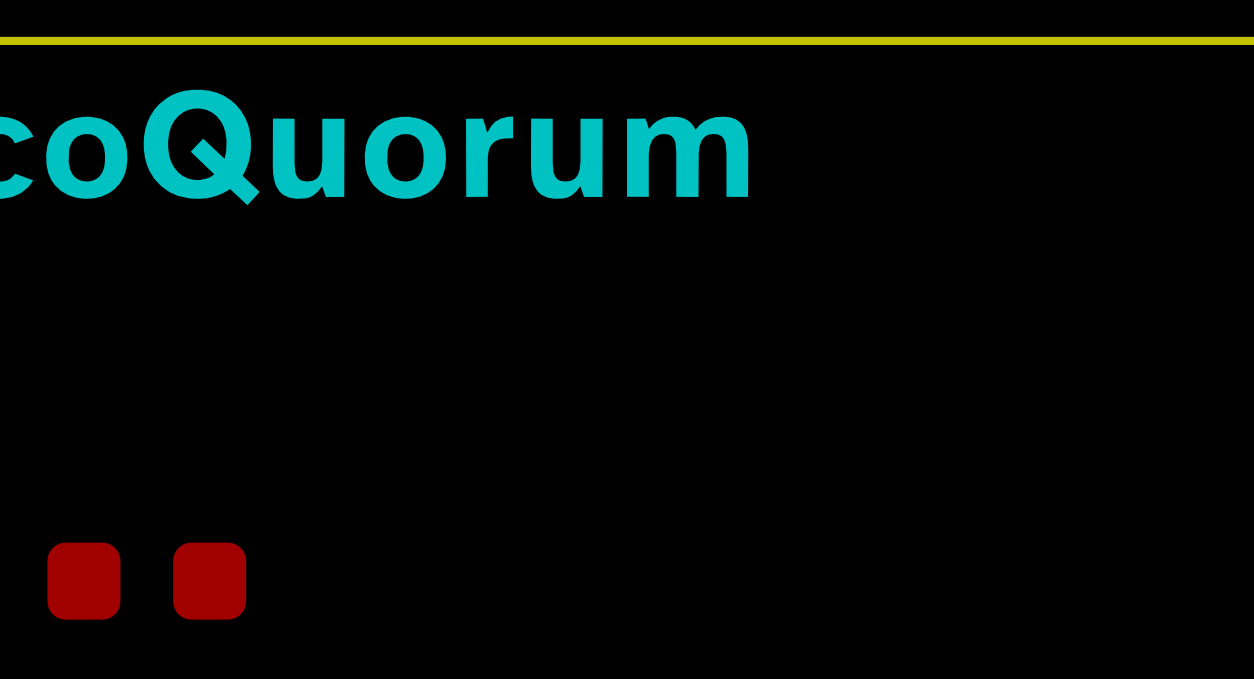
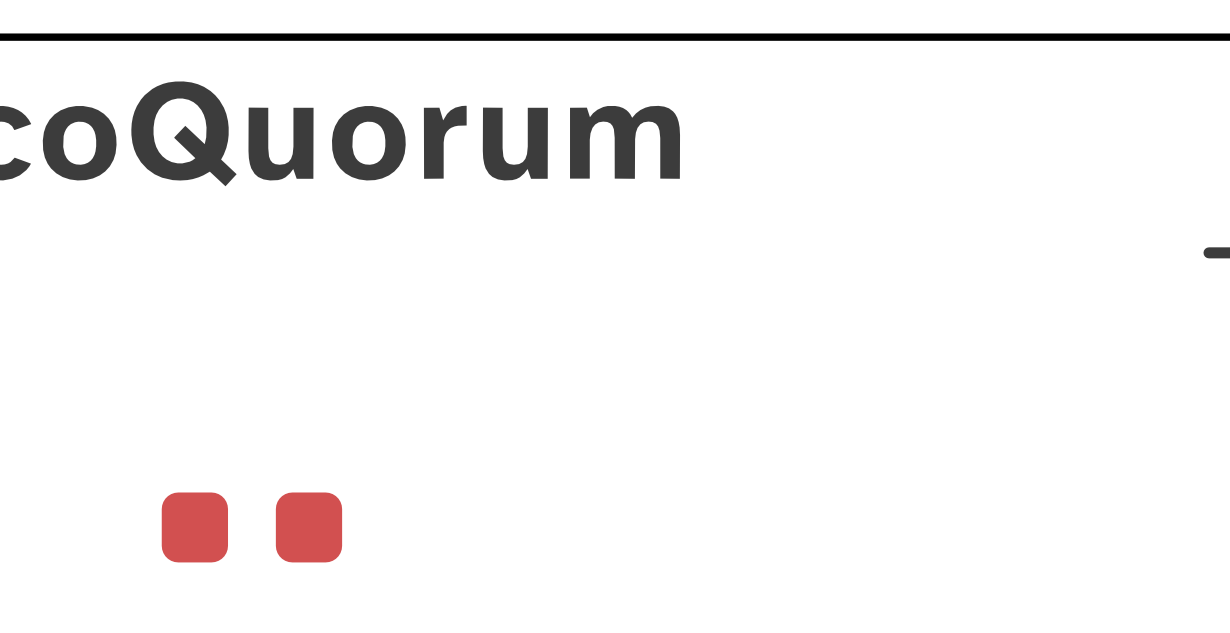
part position: (146, 581) -> (251, 527)

